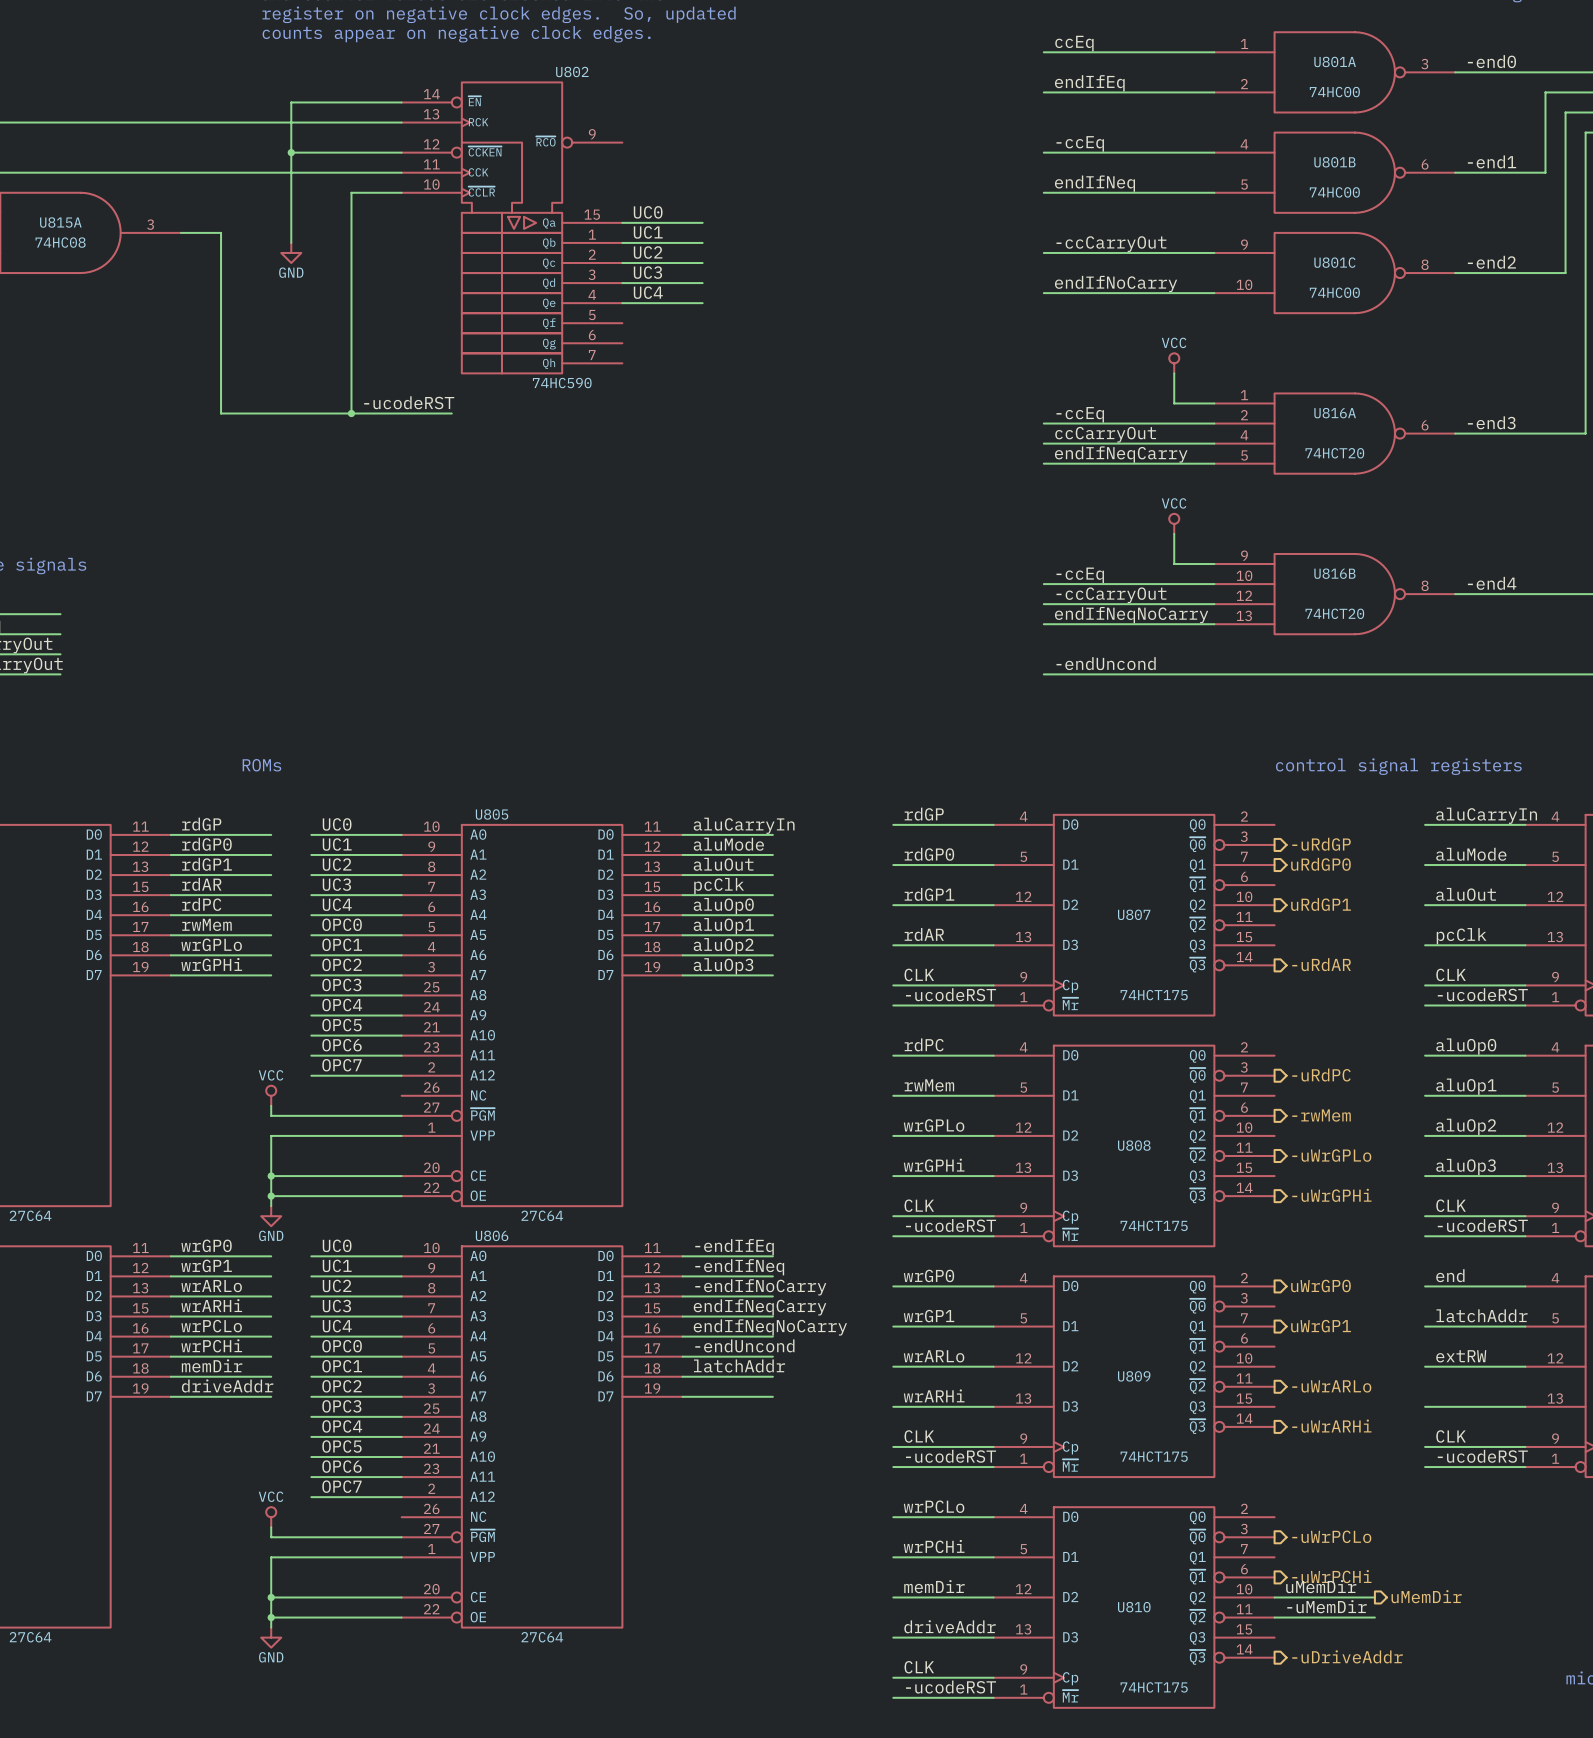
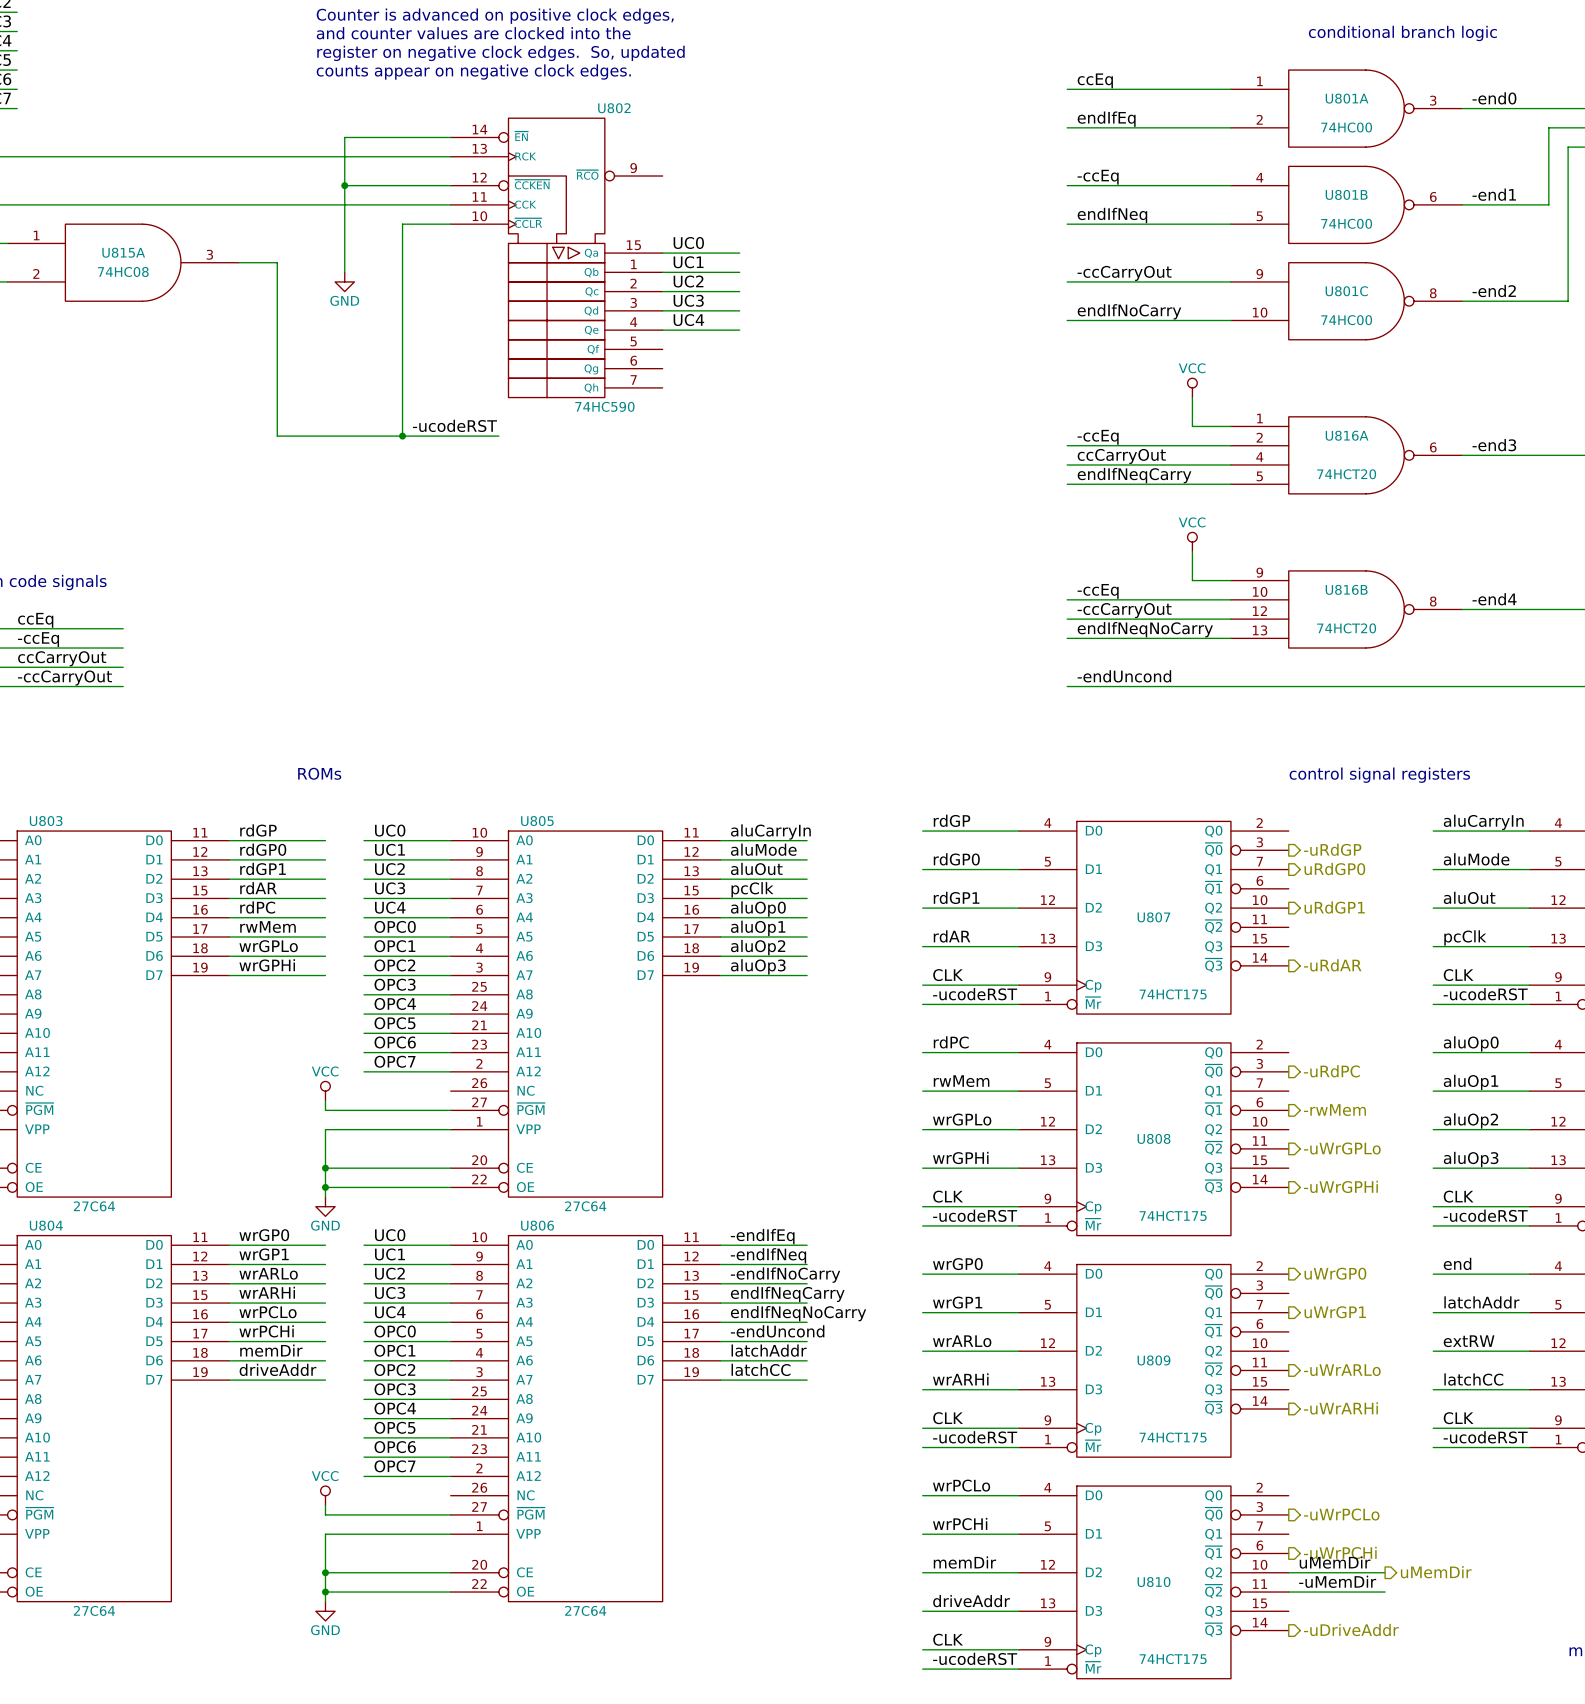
label: none -> latchCC (760, 1369)
label: none -> latchCC (1473, 1379)

